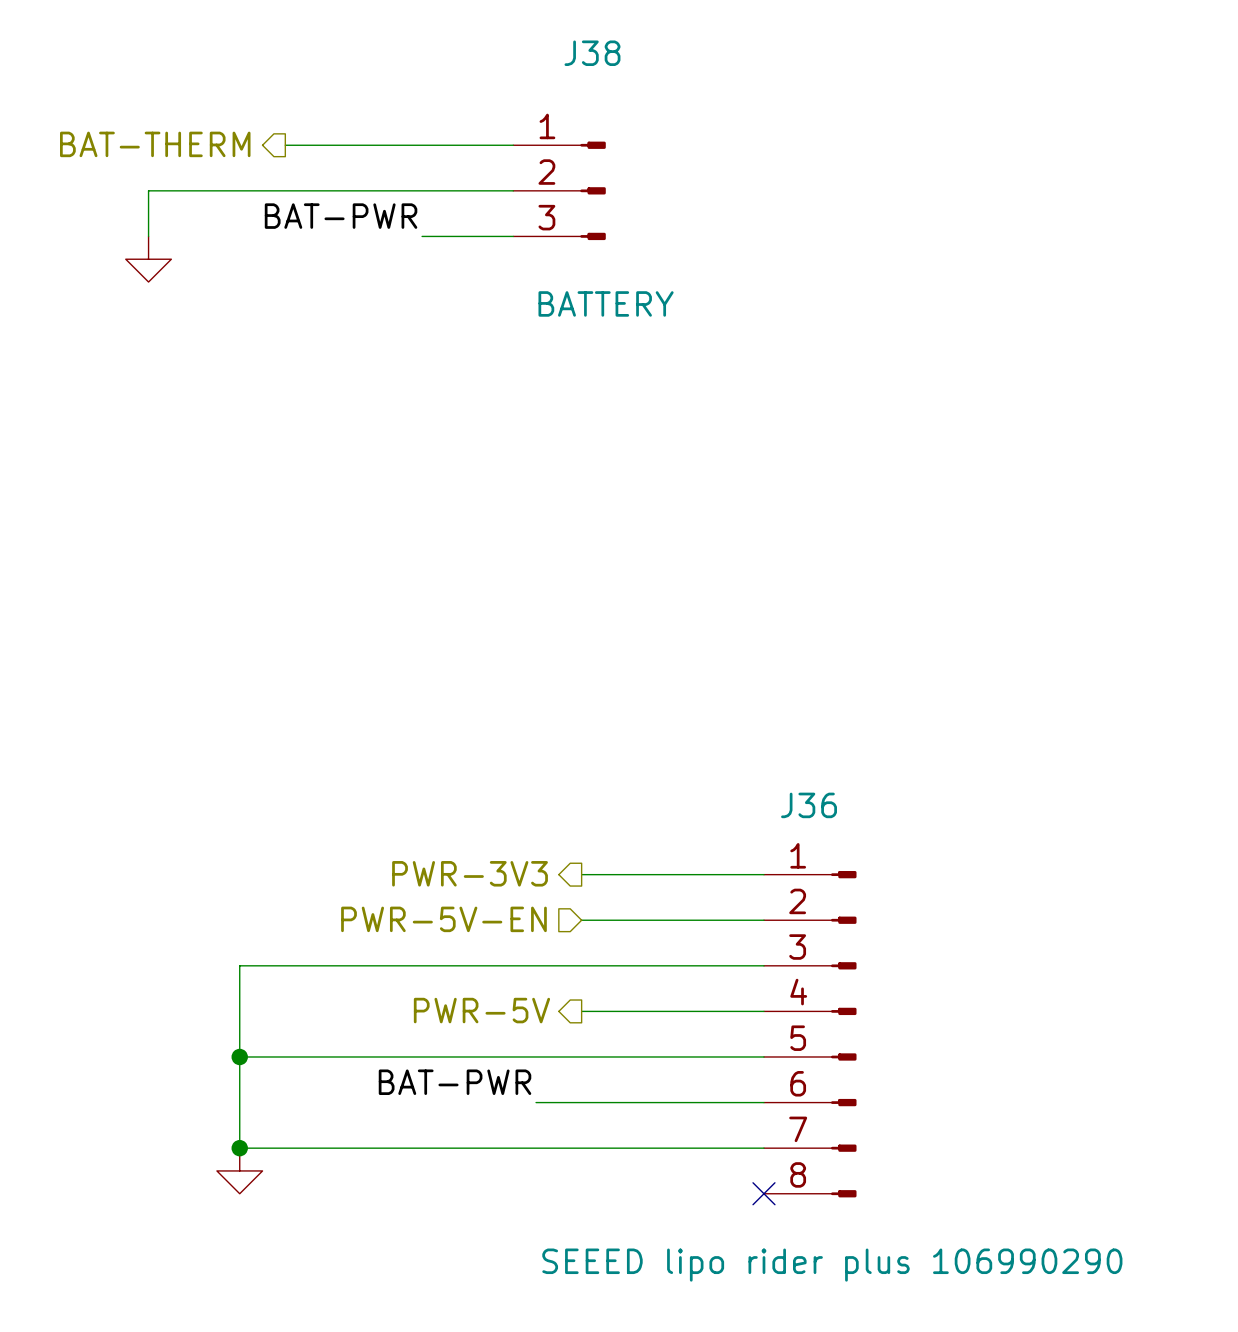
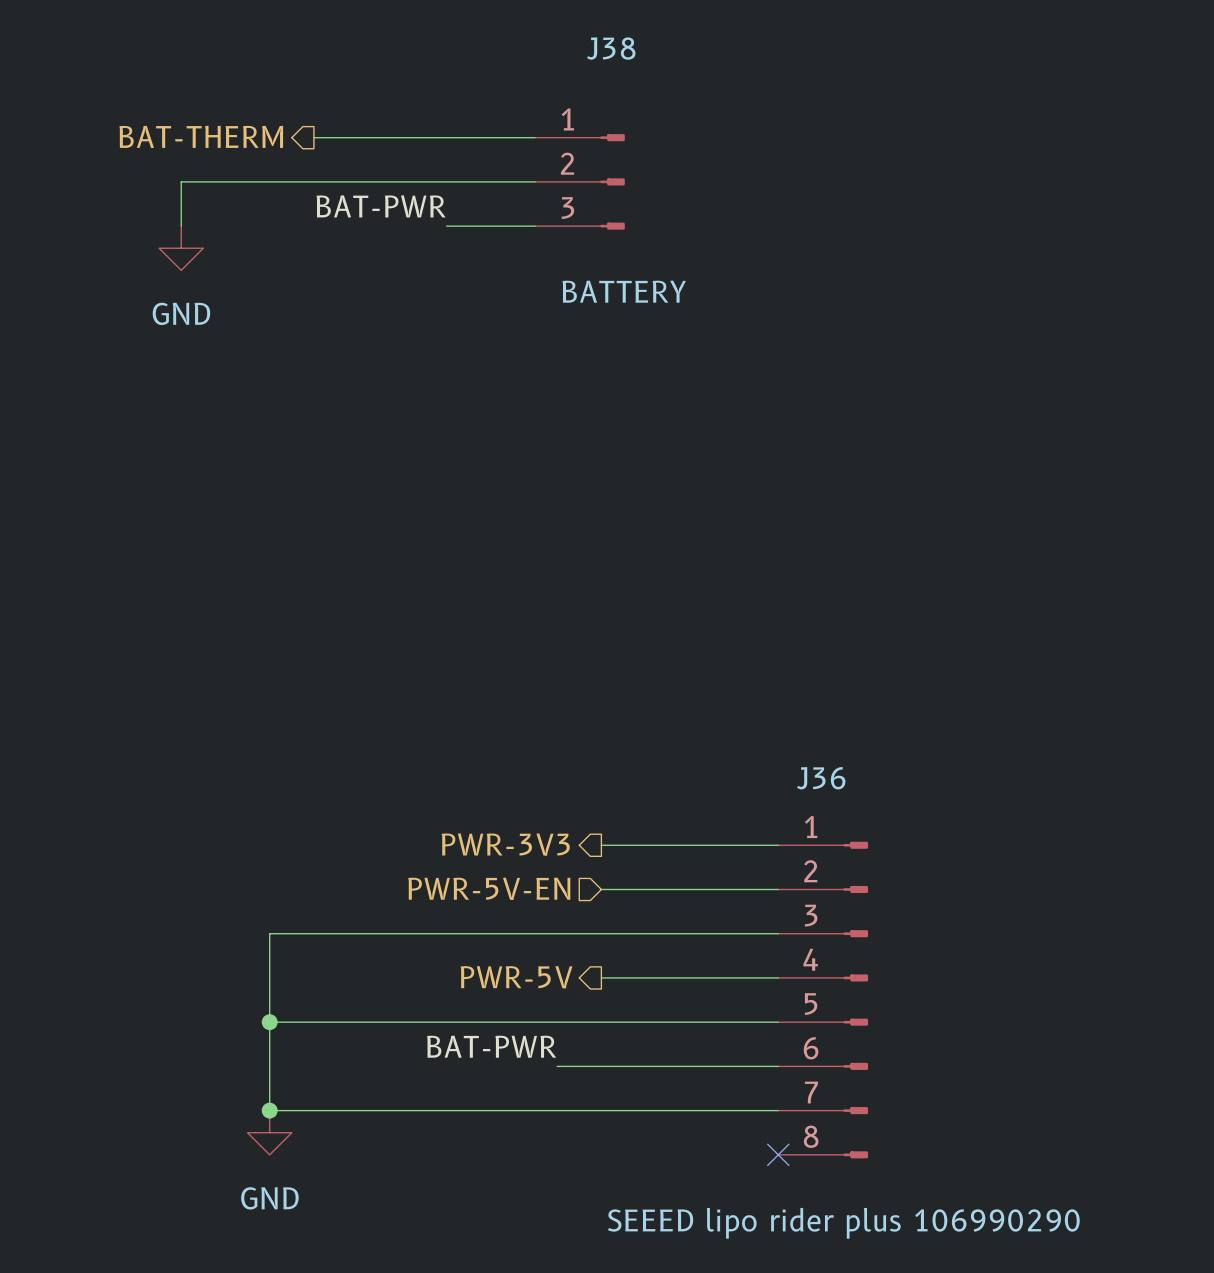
power symbol text: none -> GND (181, 313)
power symbol text: none -> GND (269, 1198)

